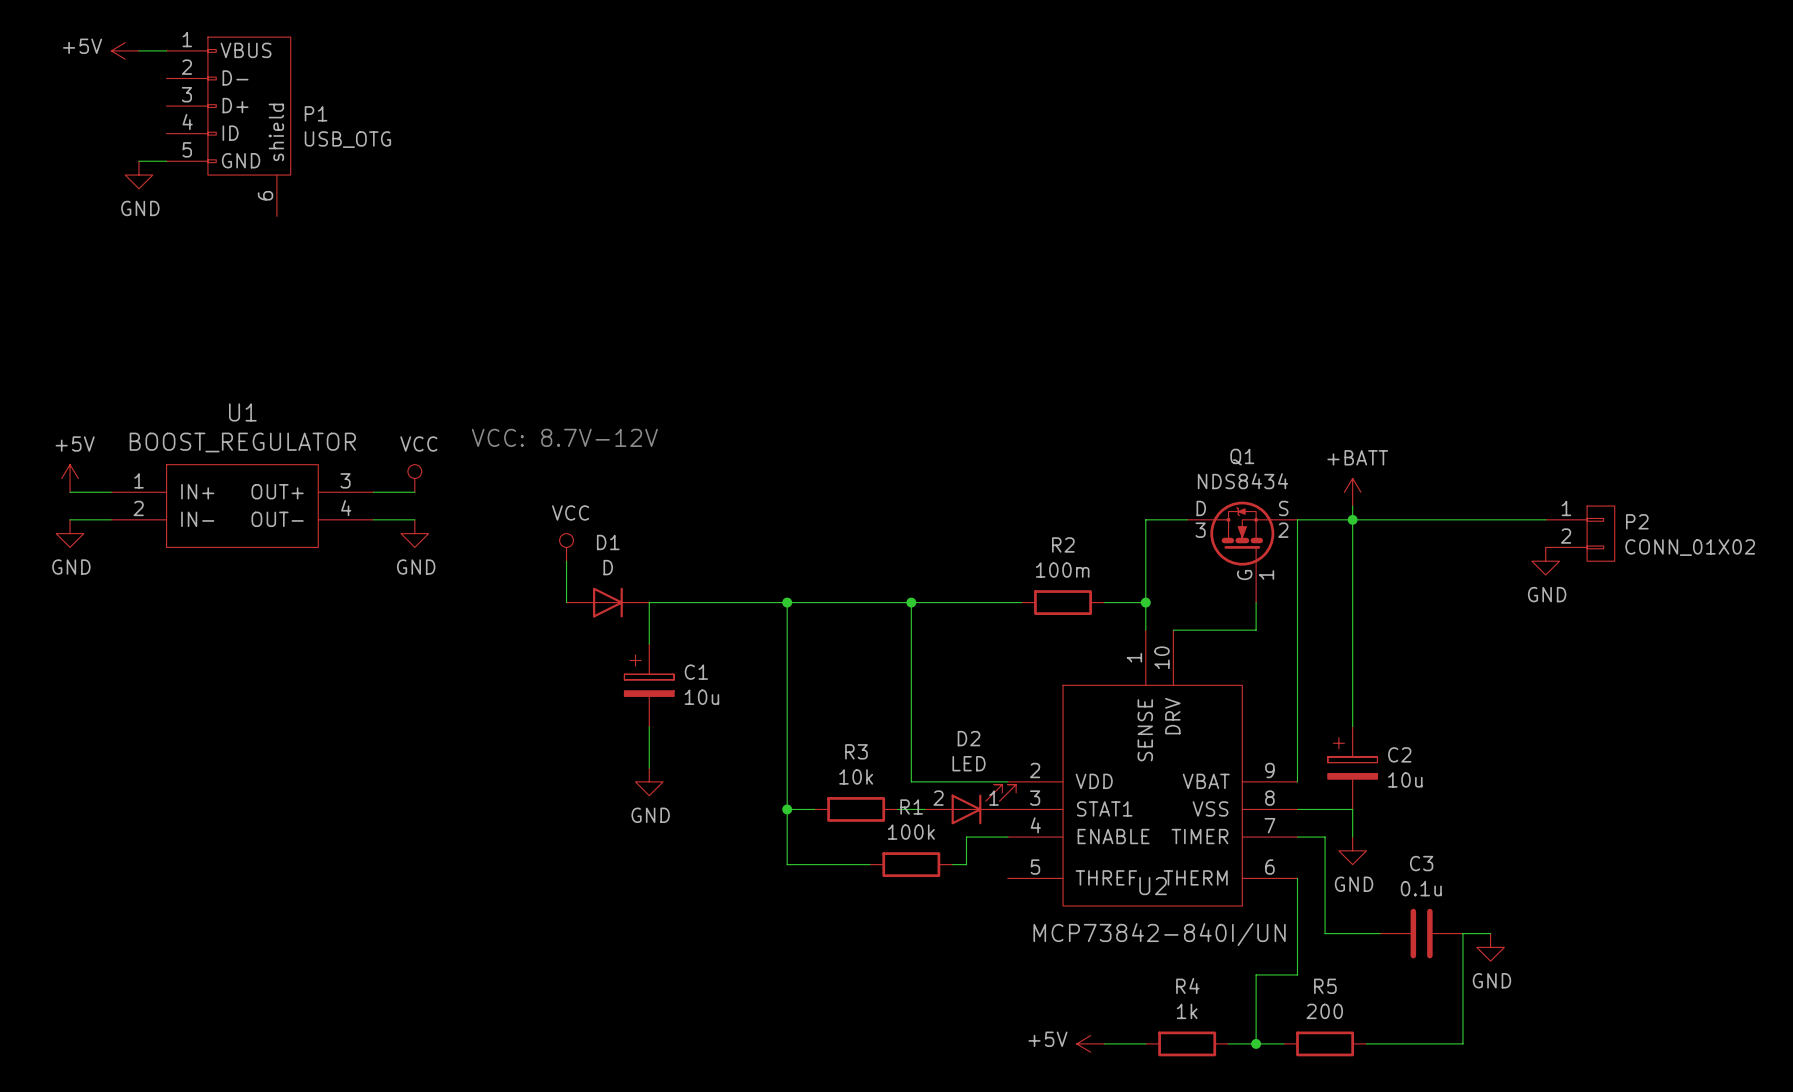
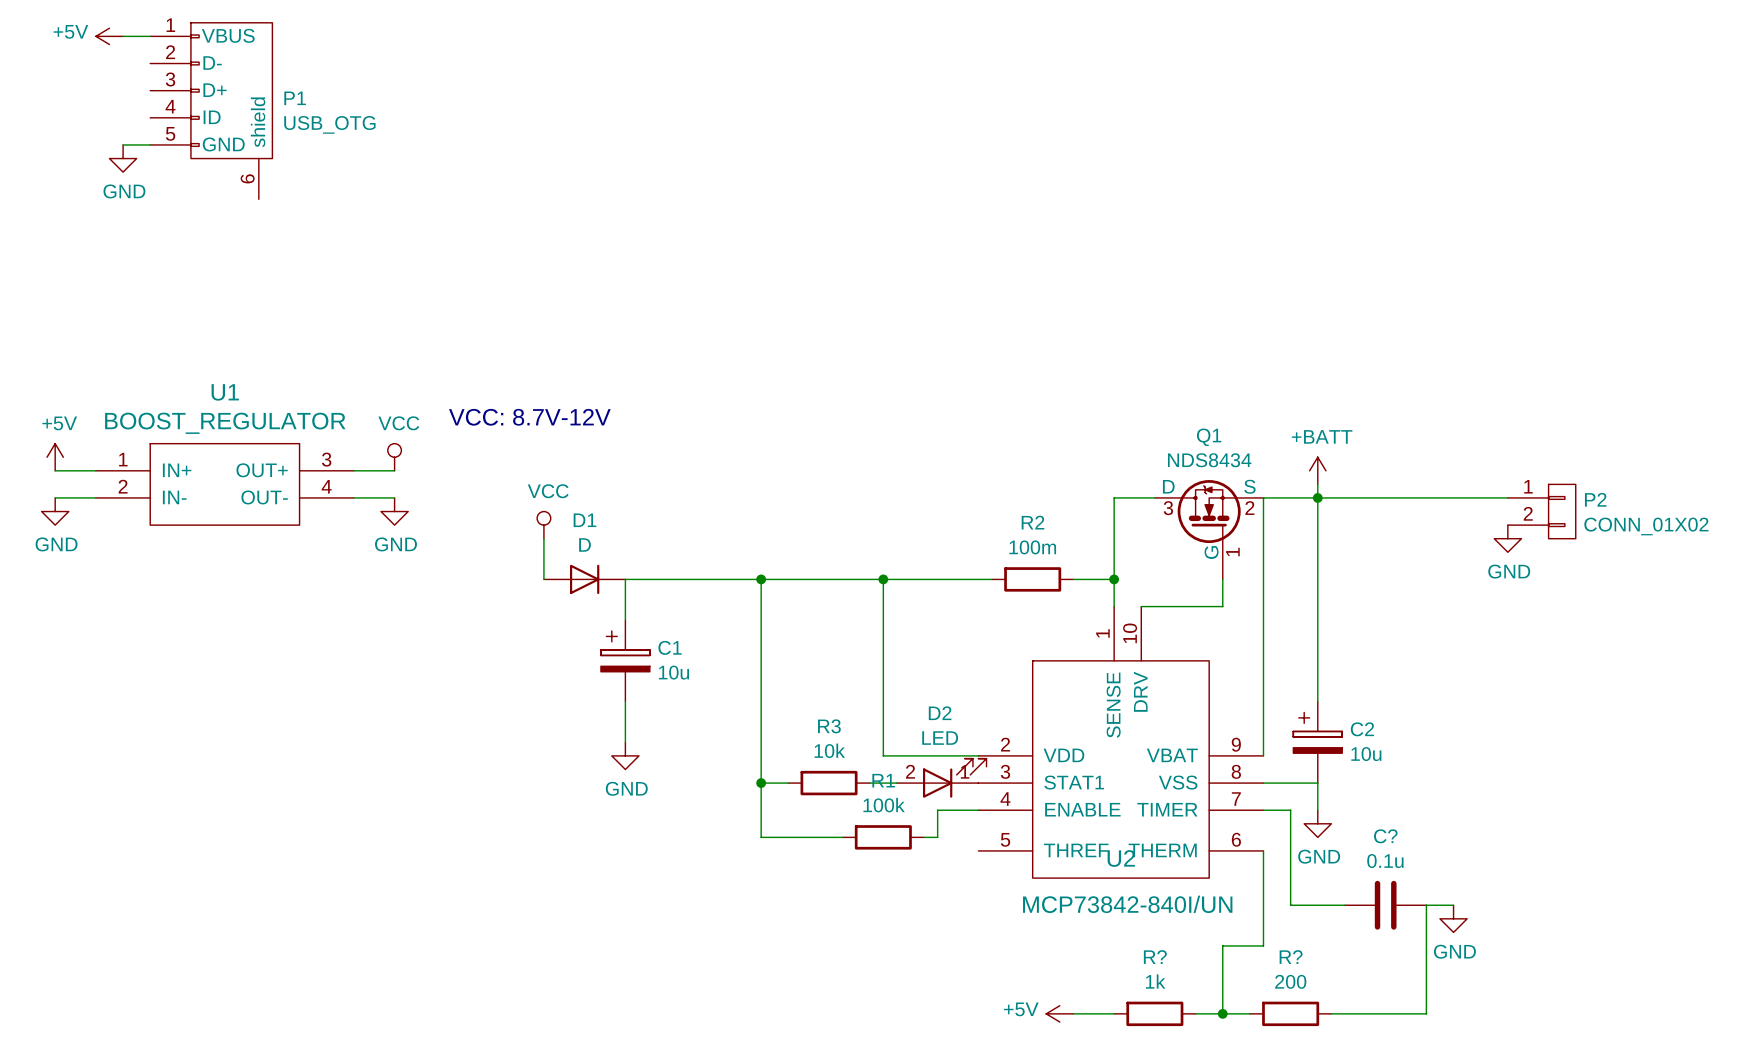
C3 name: C3 (1421, 863) -> C? (1385, 836)
R4 name: R4 (1187, 985) -> R? (1155, 957)
R5 name: R5 (1325, 986) -> R? (1291, 957)

